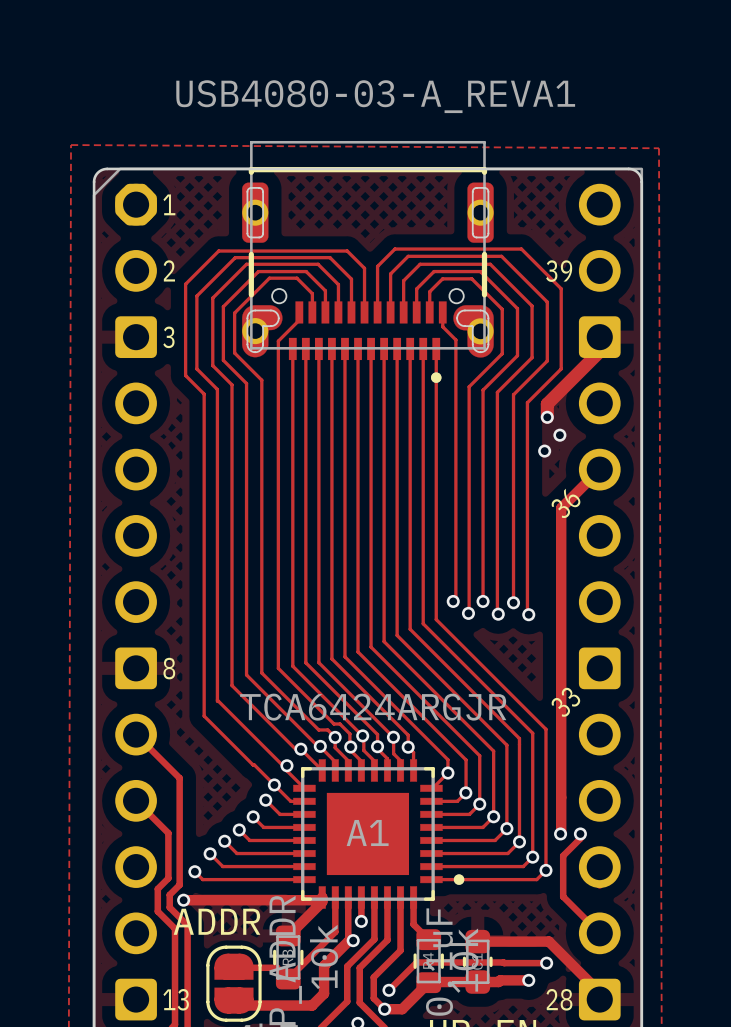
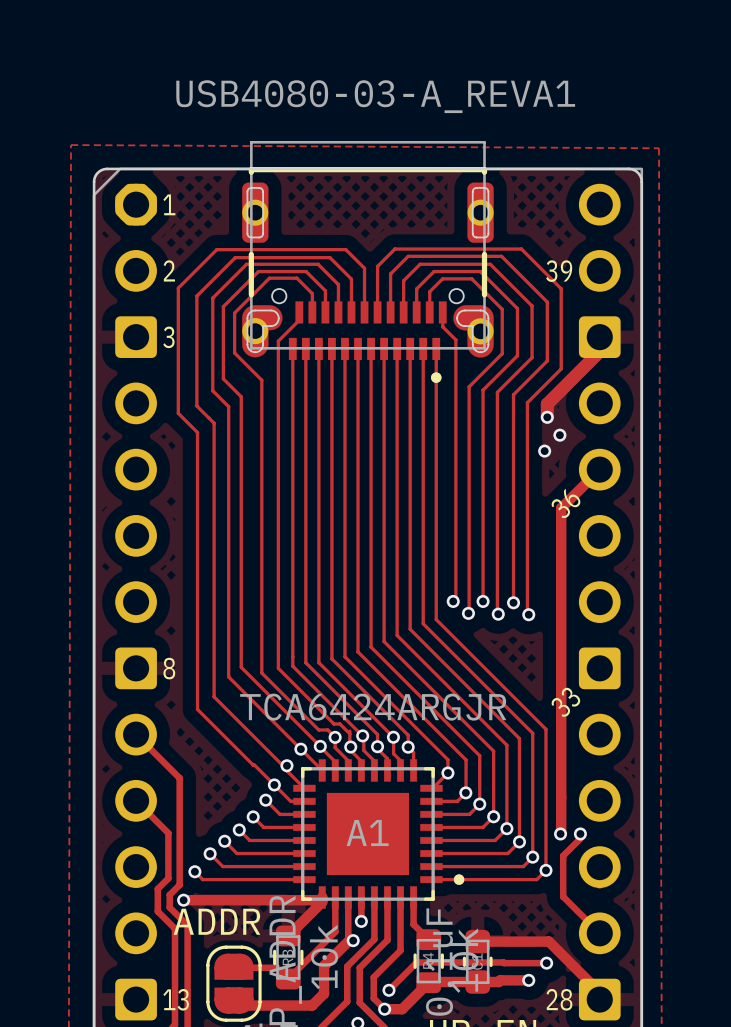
track: (347, 251) (218, 251) (185, 284) (185, 375) (204, 394) (204, 716) -> (347, 251) (216, 249) (178, 288) (178, 413) (197, 432) (197, 709) (204, 716)
track: (223, 360) (246, 383) (246, 674) (317, 746) (320, 746) -> (223, 360) (223, 378) (241, 396) (241, 667) (320, 746)
track: (212, 365) (231, 384) (231, 685) (295, 749) (300, 749) -> (212, 365) (212, 390) (228, 406) (228, 676) (301, 749)
track: (196, 368) (217, 389) (217, 701) -> (196, 368) (196, 406) (214, 423) (214, 696) (217, 700)

